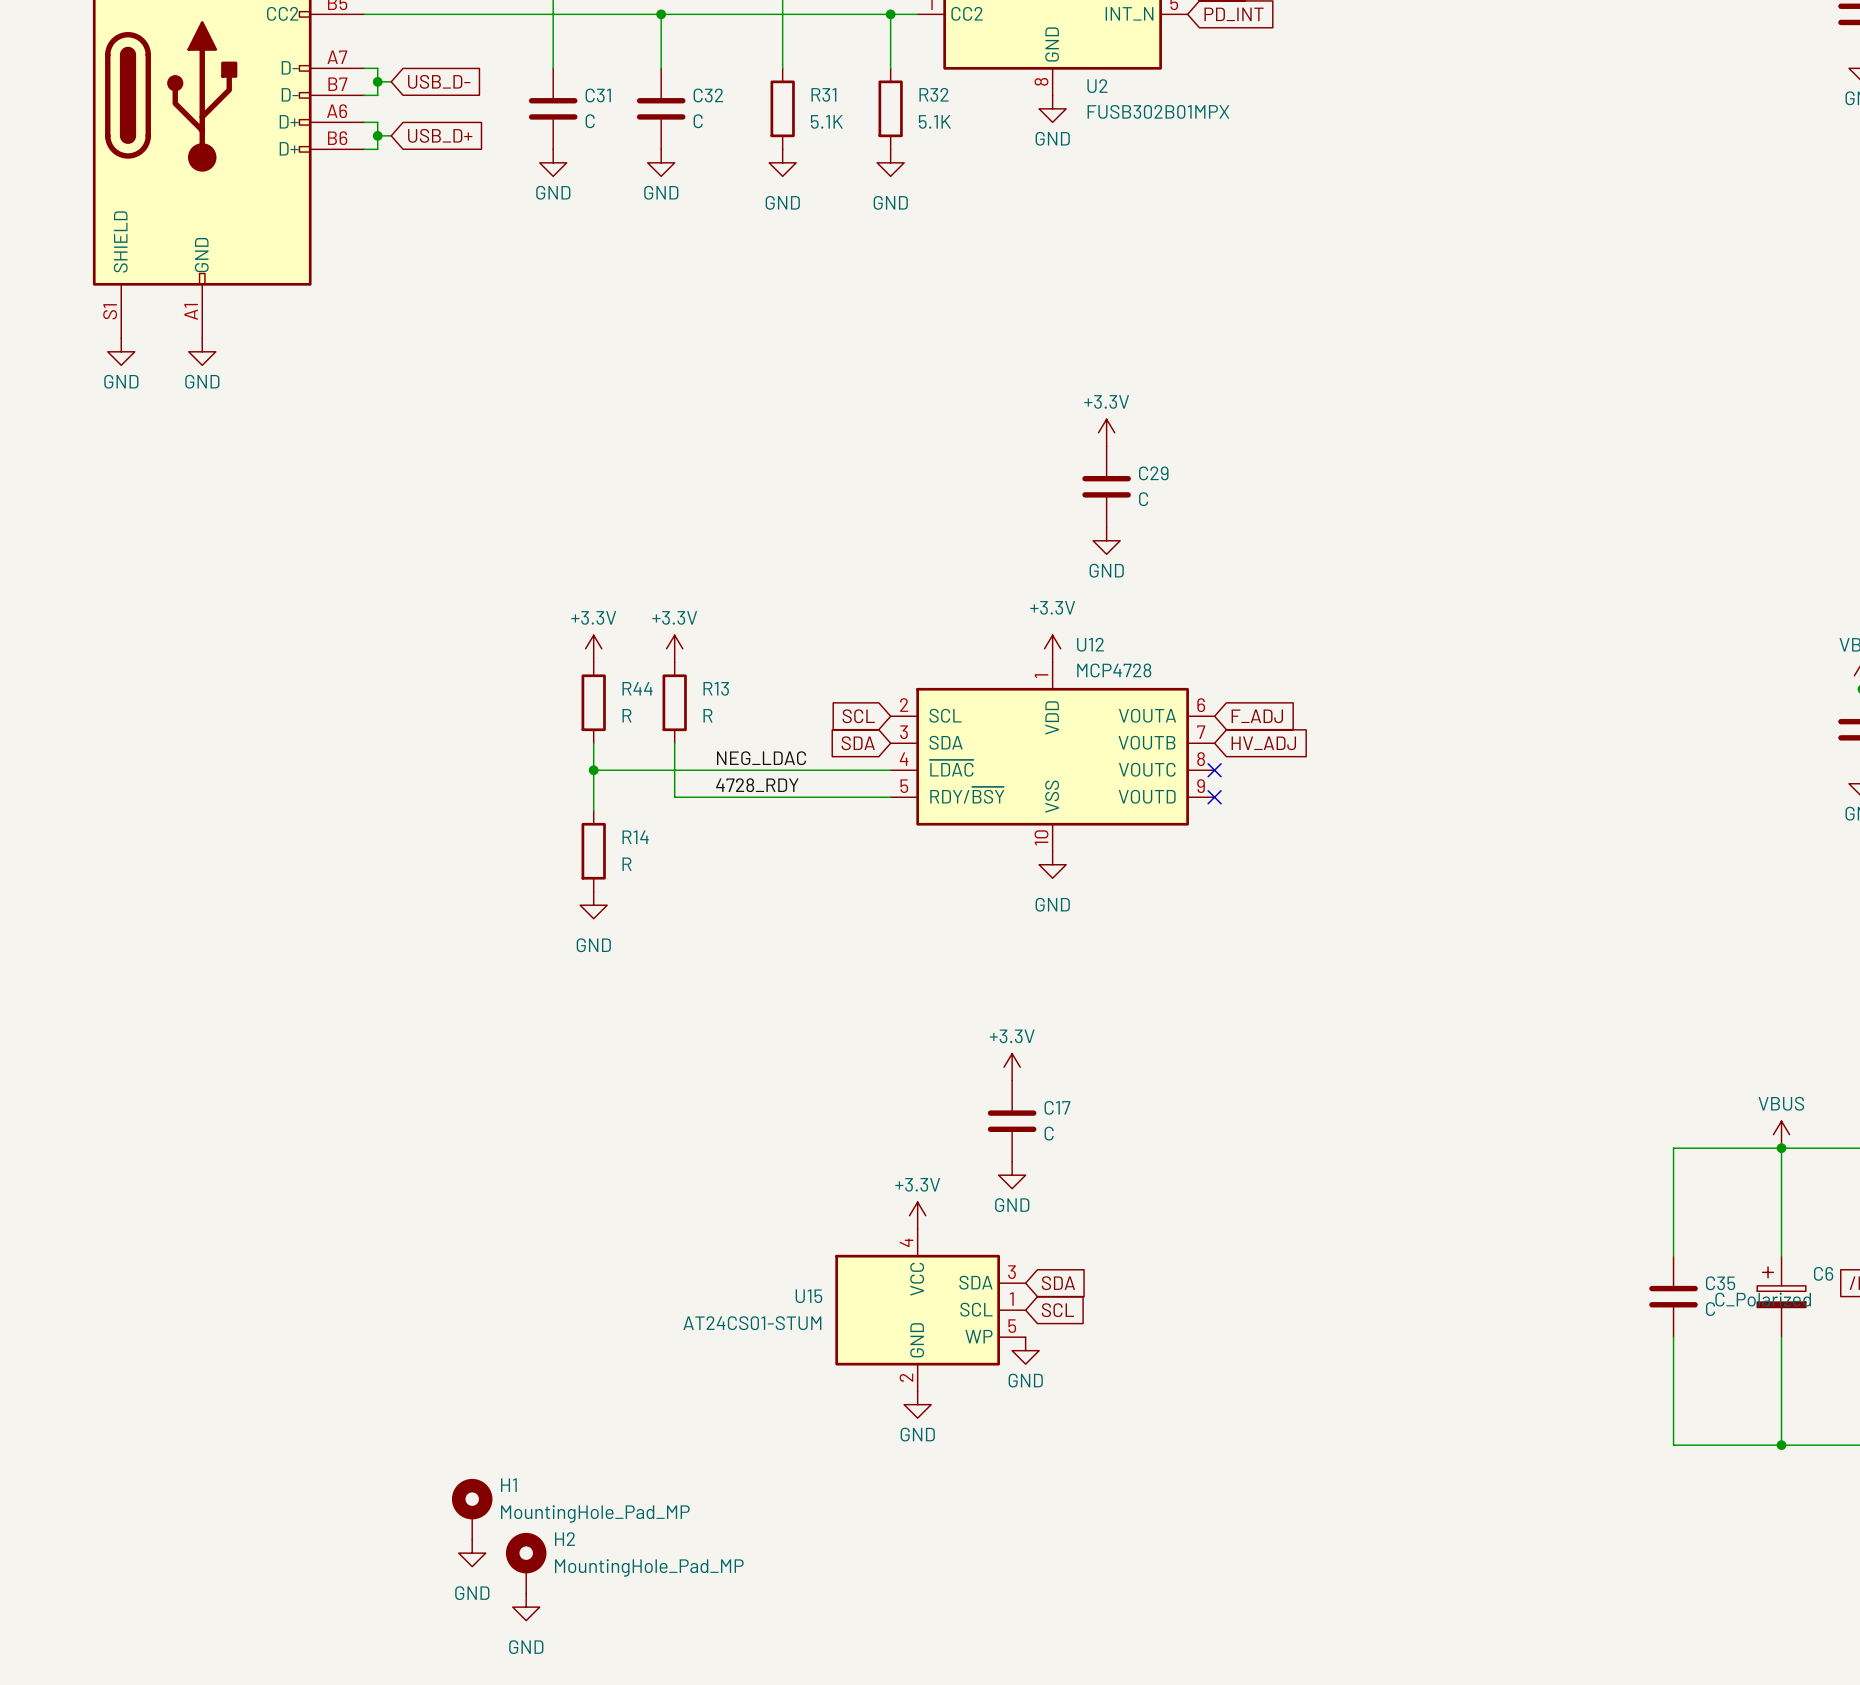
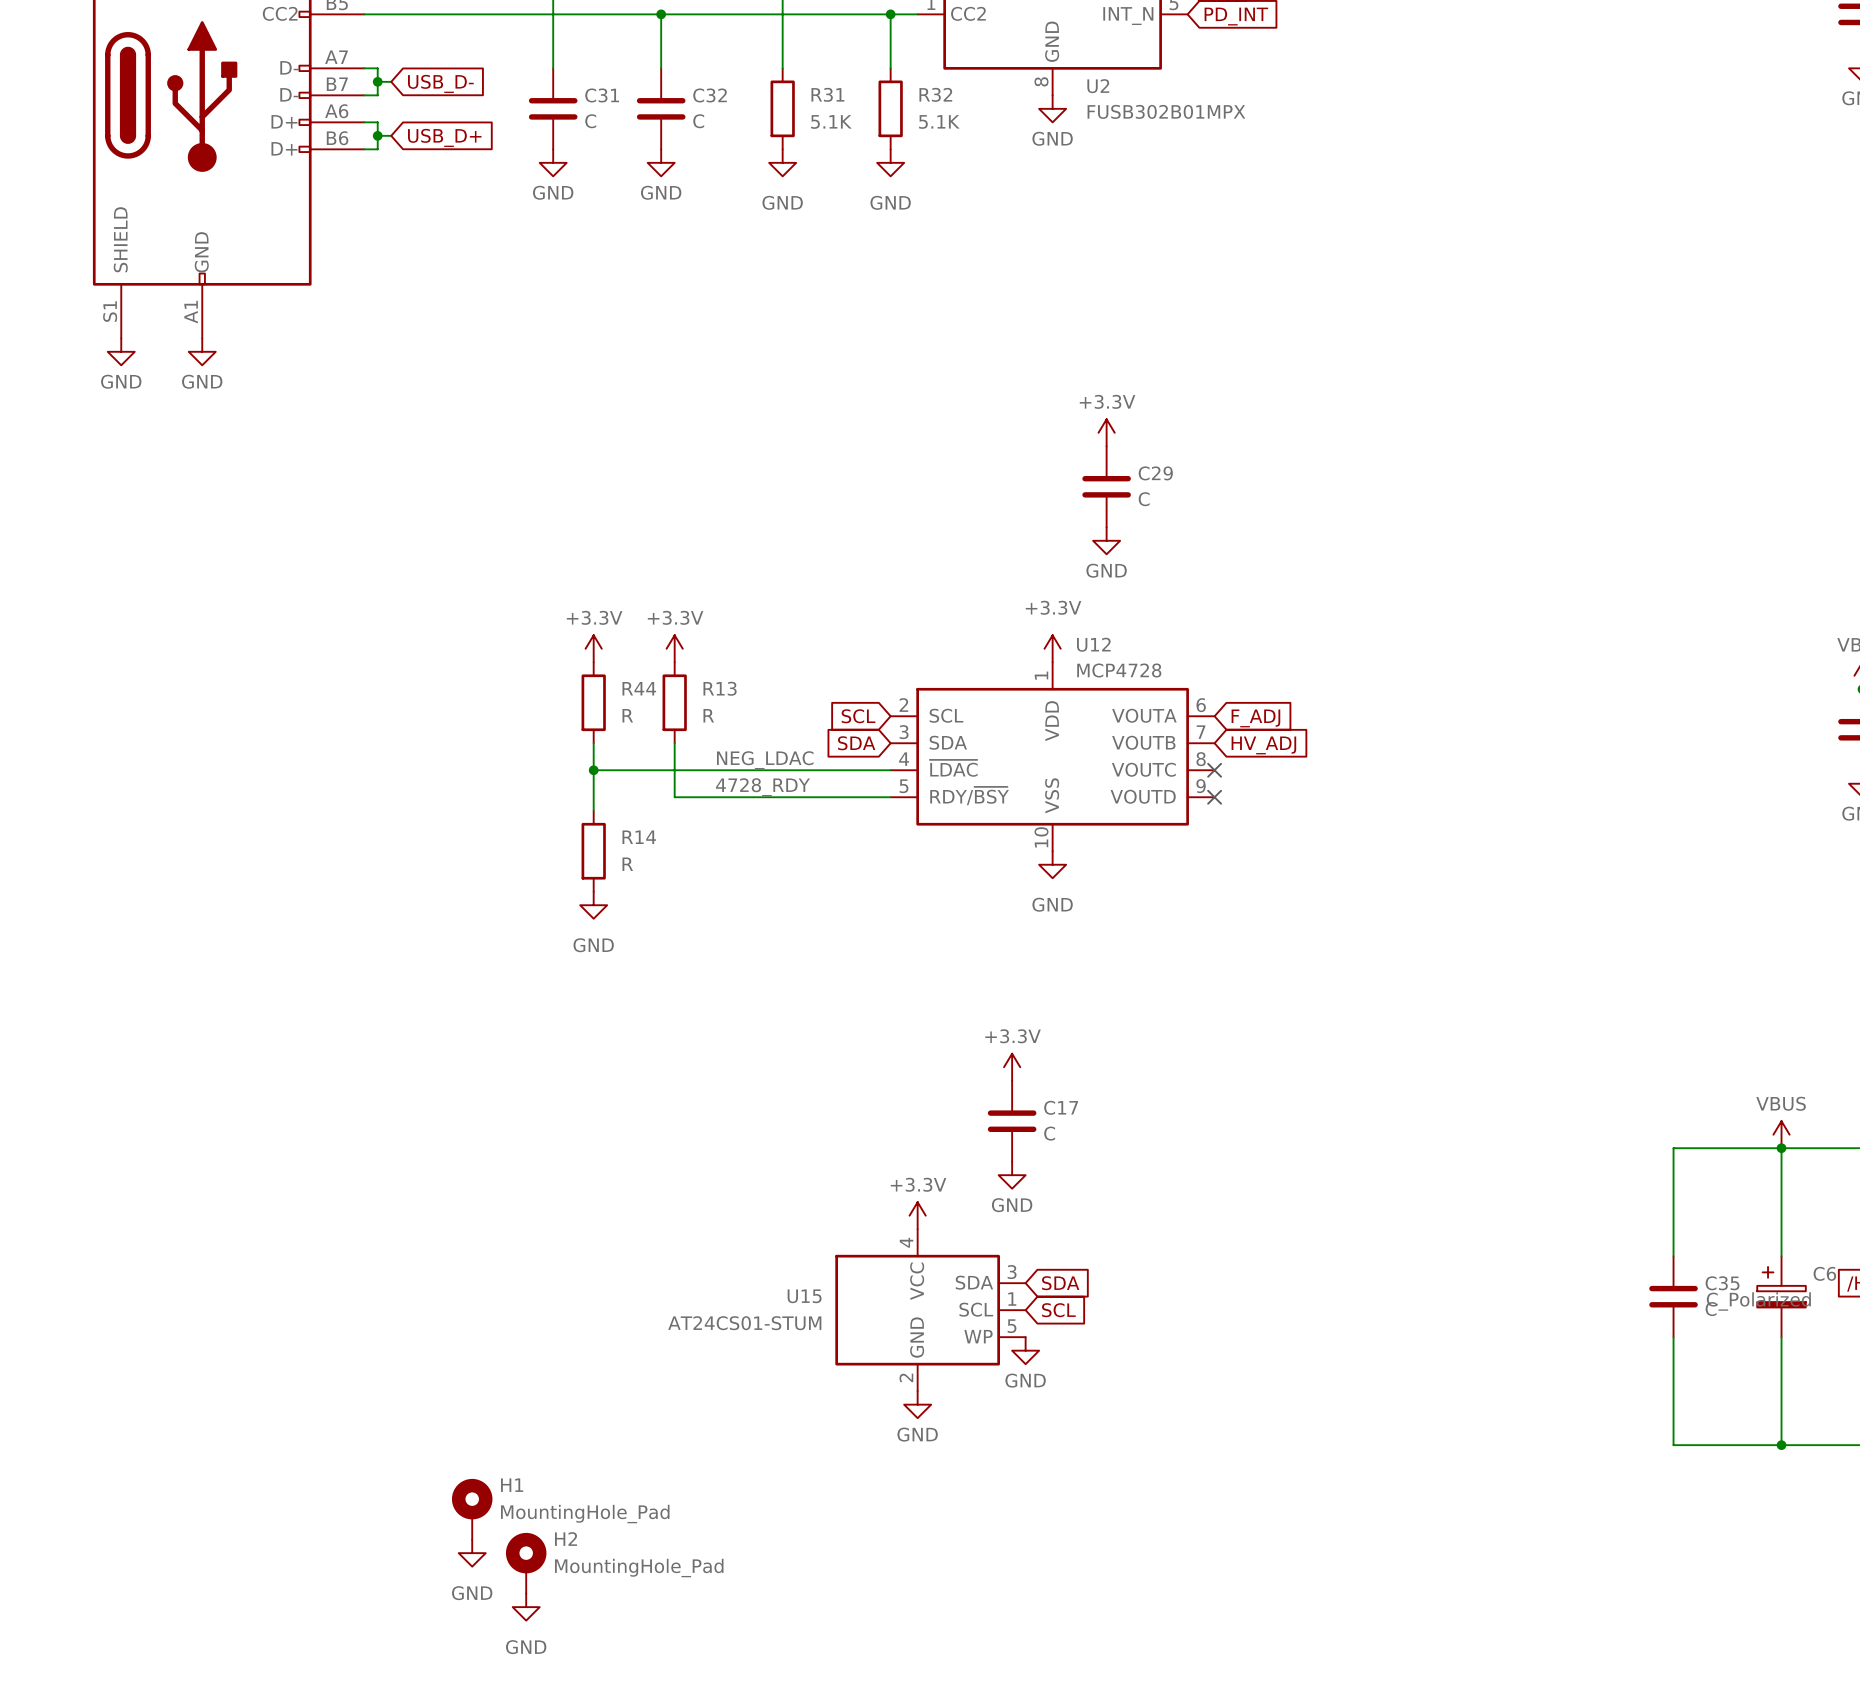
H1 value: MountingHole_Pad_MP (595, 1513) -> MountingHole_Pad (585, 1514)
H2 value: MountingHole_Pad_MP (649, 1567) -> MountingHole_Pad (639, 1568)

